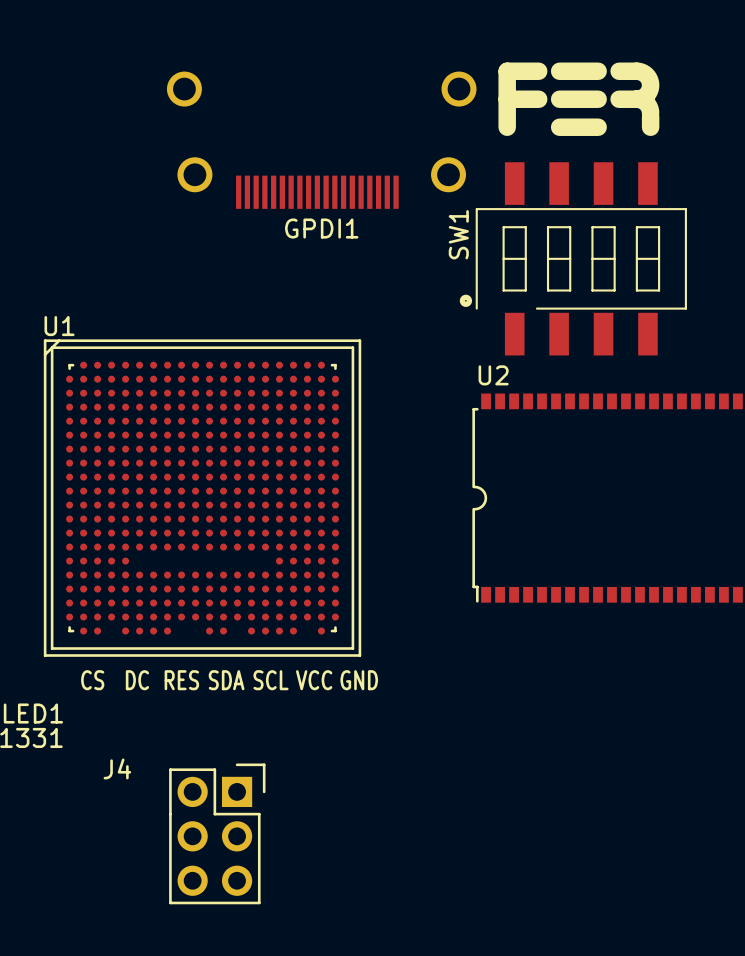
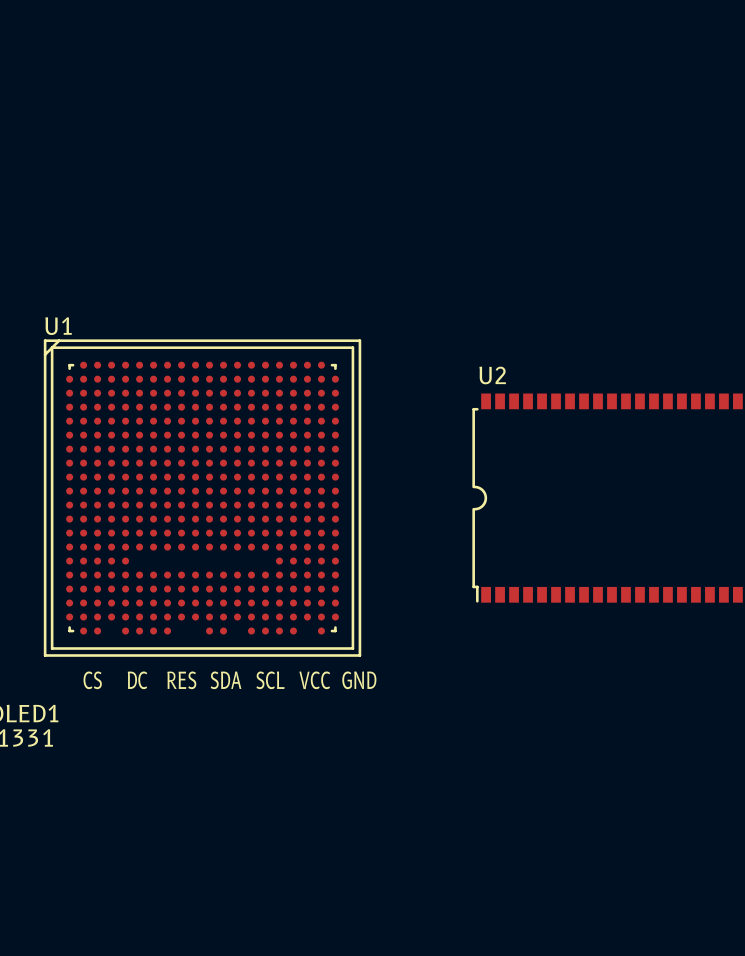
drawing: [498, 62, 660, 136] -> none
GPDI1: (321, 140) -> none
SW1: (573, 258) -> none
J4: (217, 833) -> none

